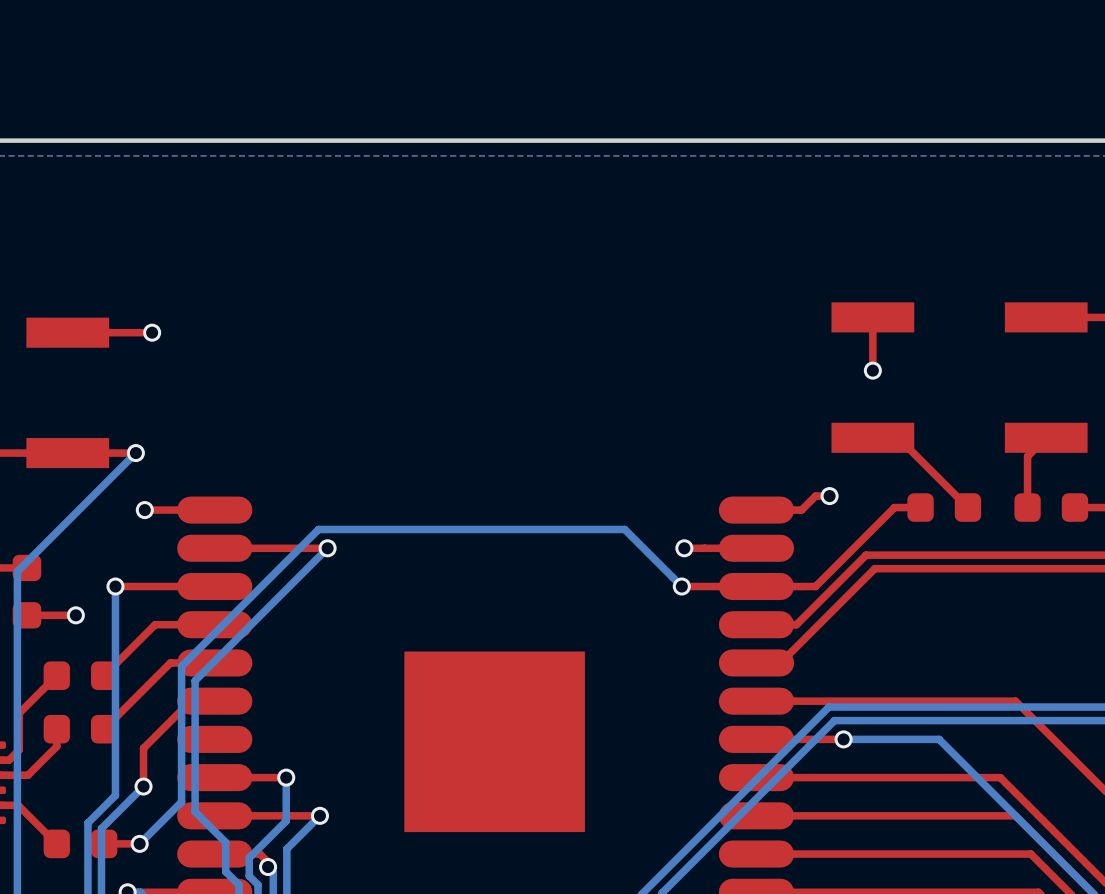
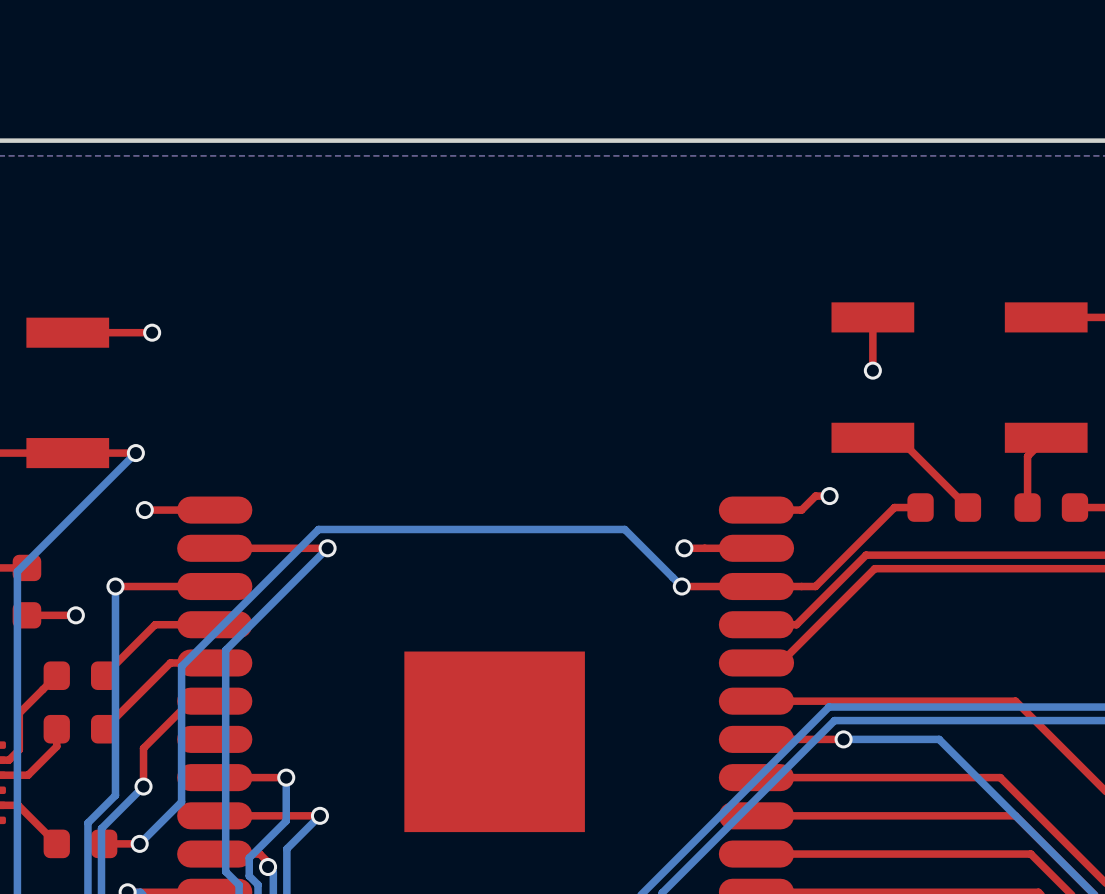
bottom track: (225, 650) (195, 680) (195, 811) (225, 842) -> (225, 650) (225, 842)

